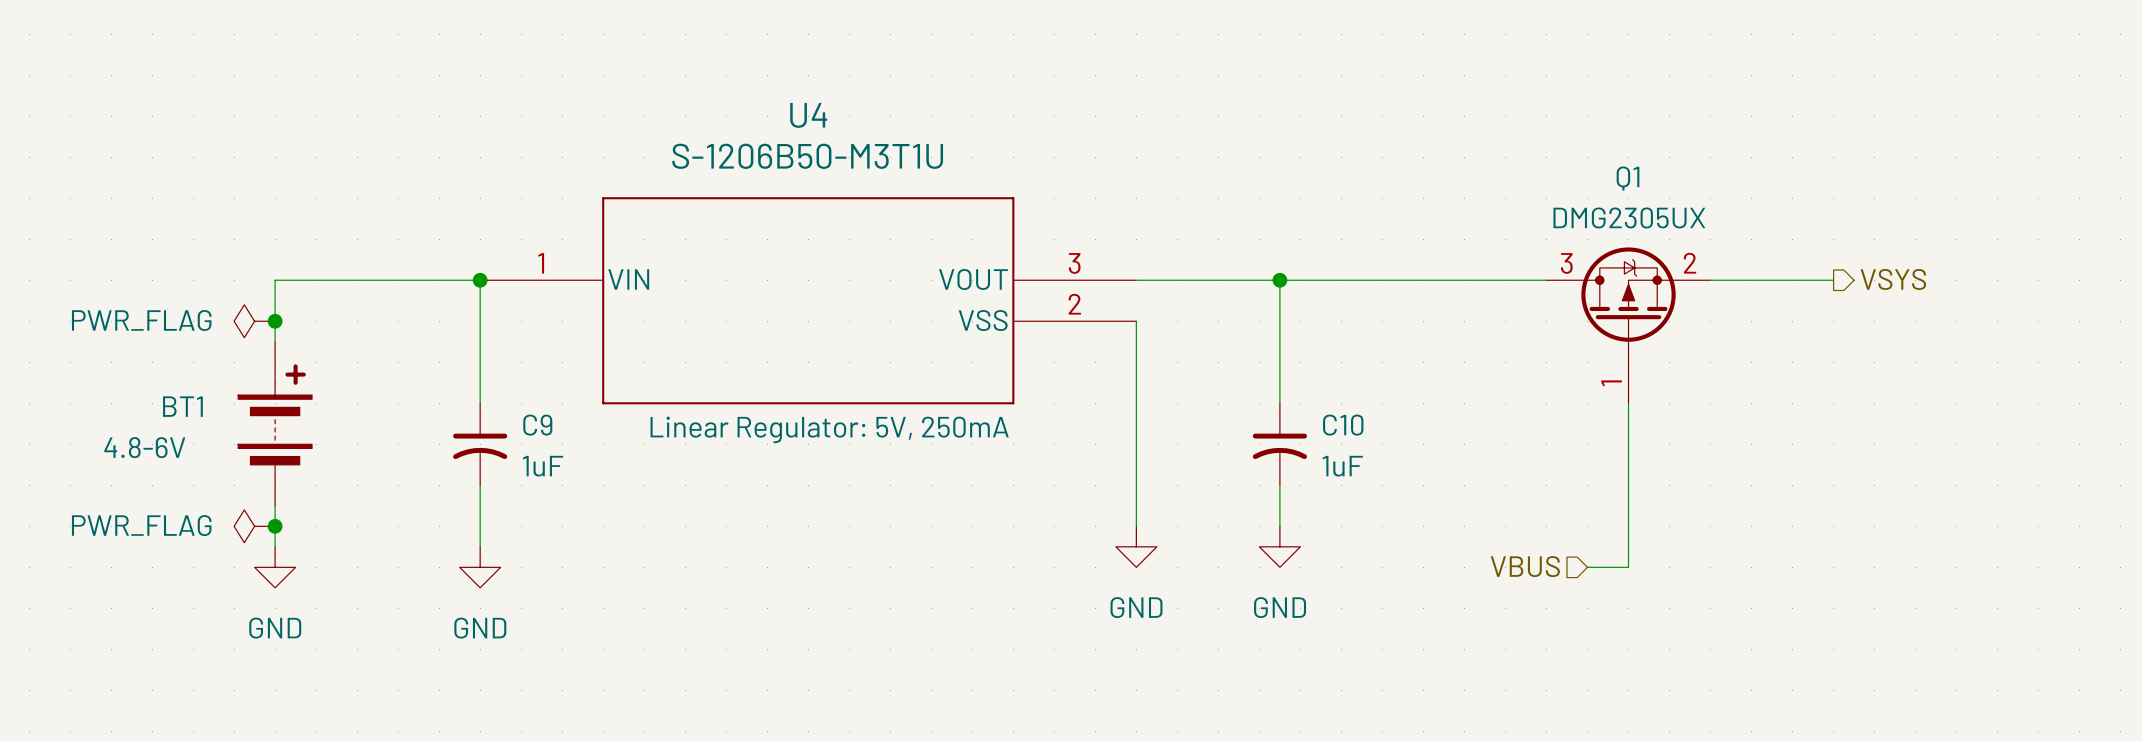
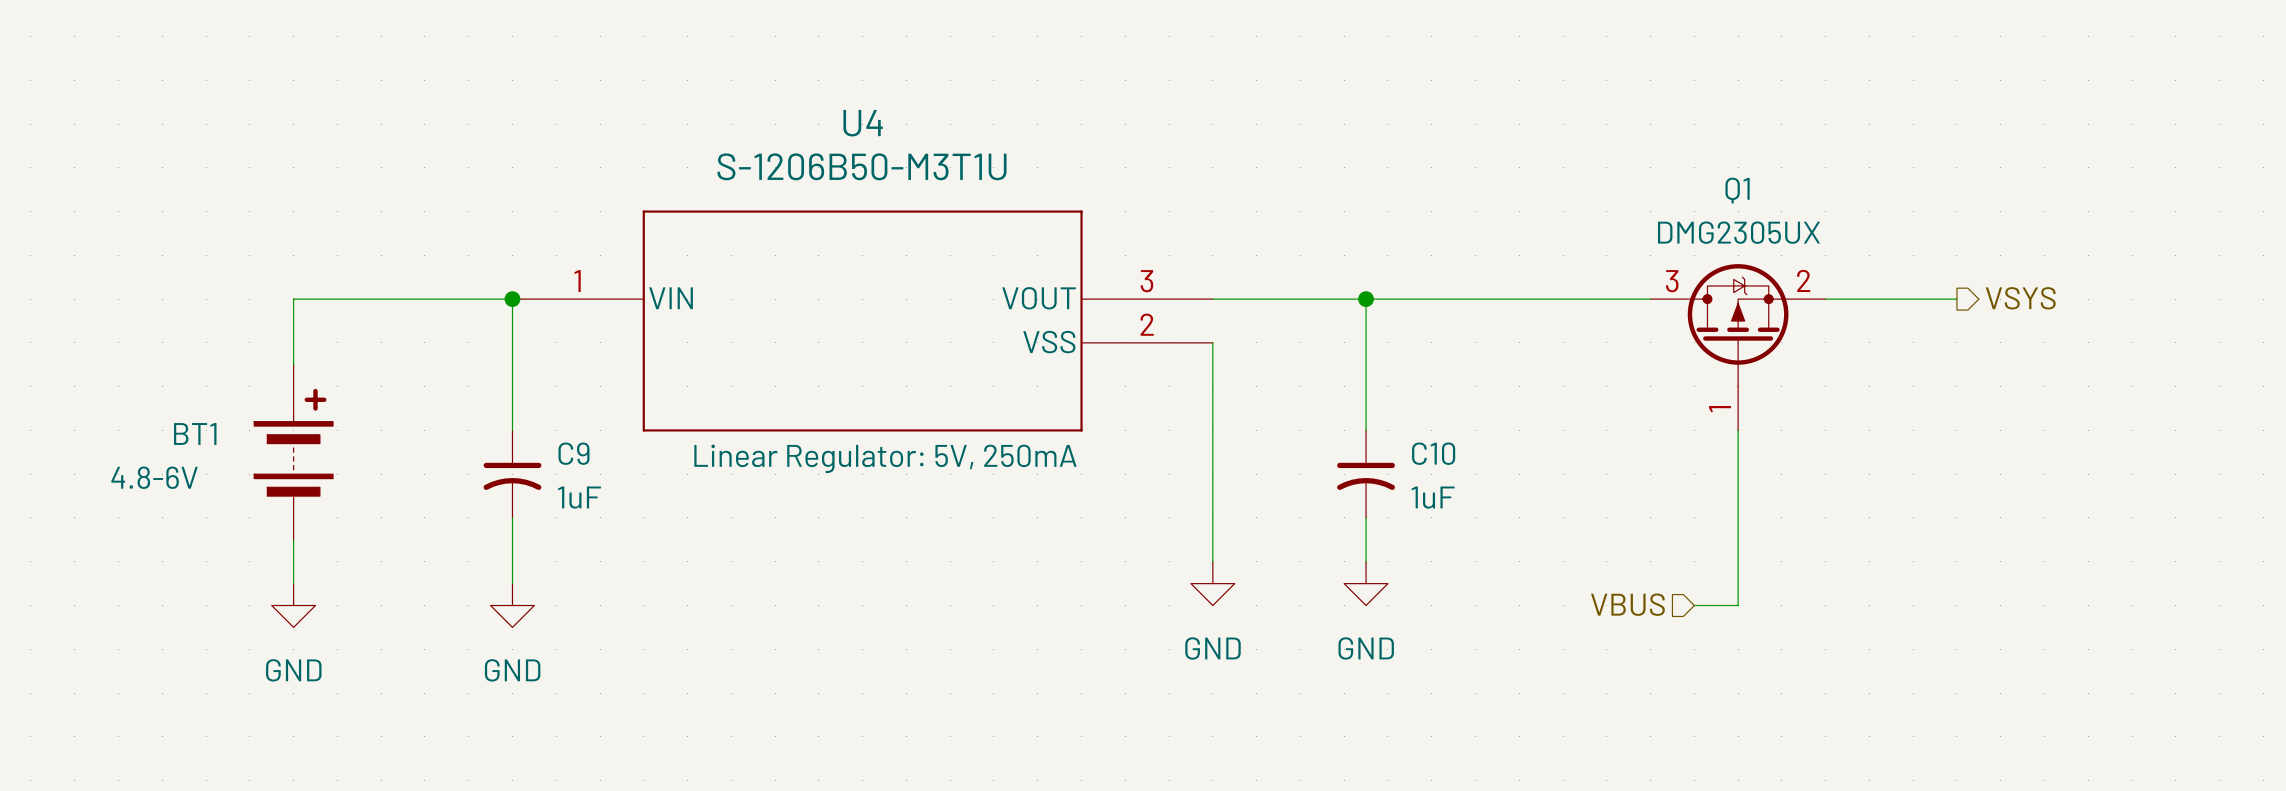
power symbol: PWR_FLAG (254, 321) -> none
junction: (275, 321) -> none
power symbol: PWR_FLAG (254, 526) -> none
junction: (275, 526) -> none

